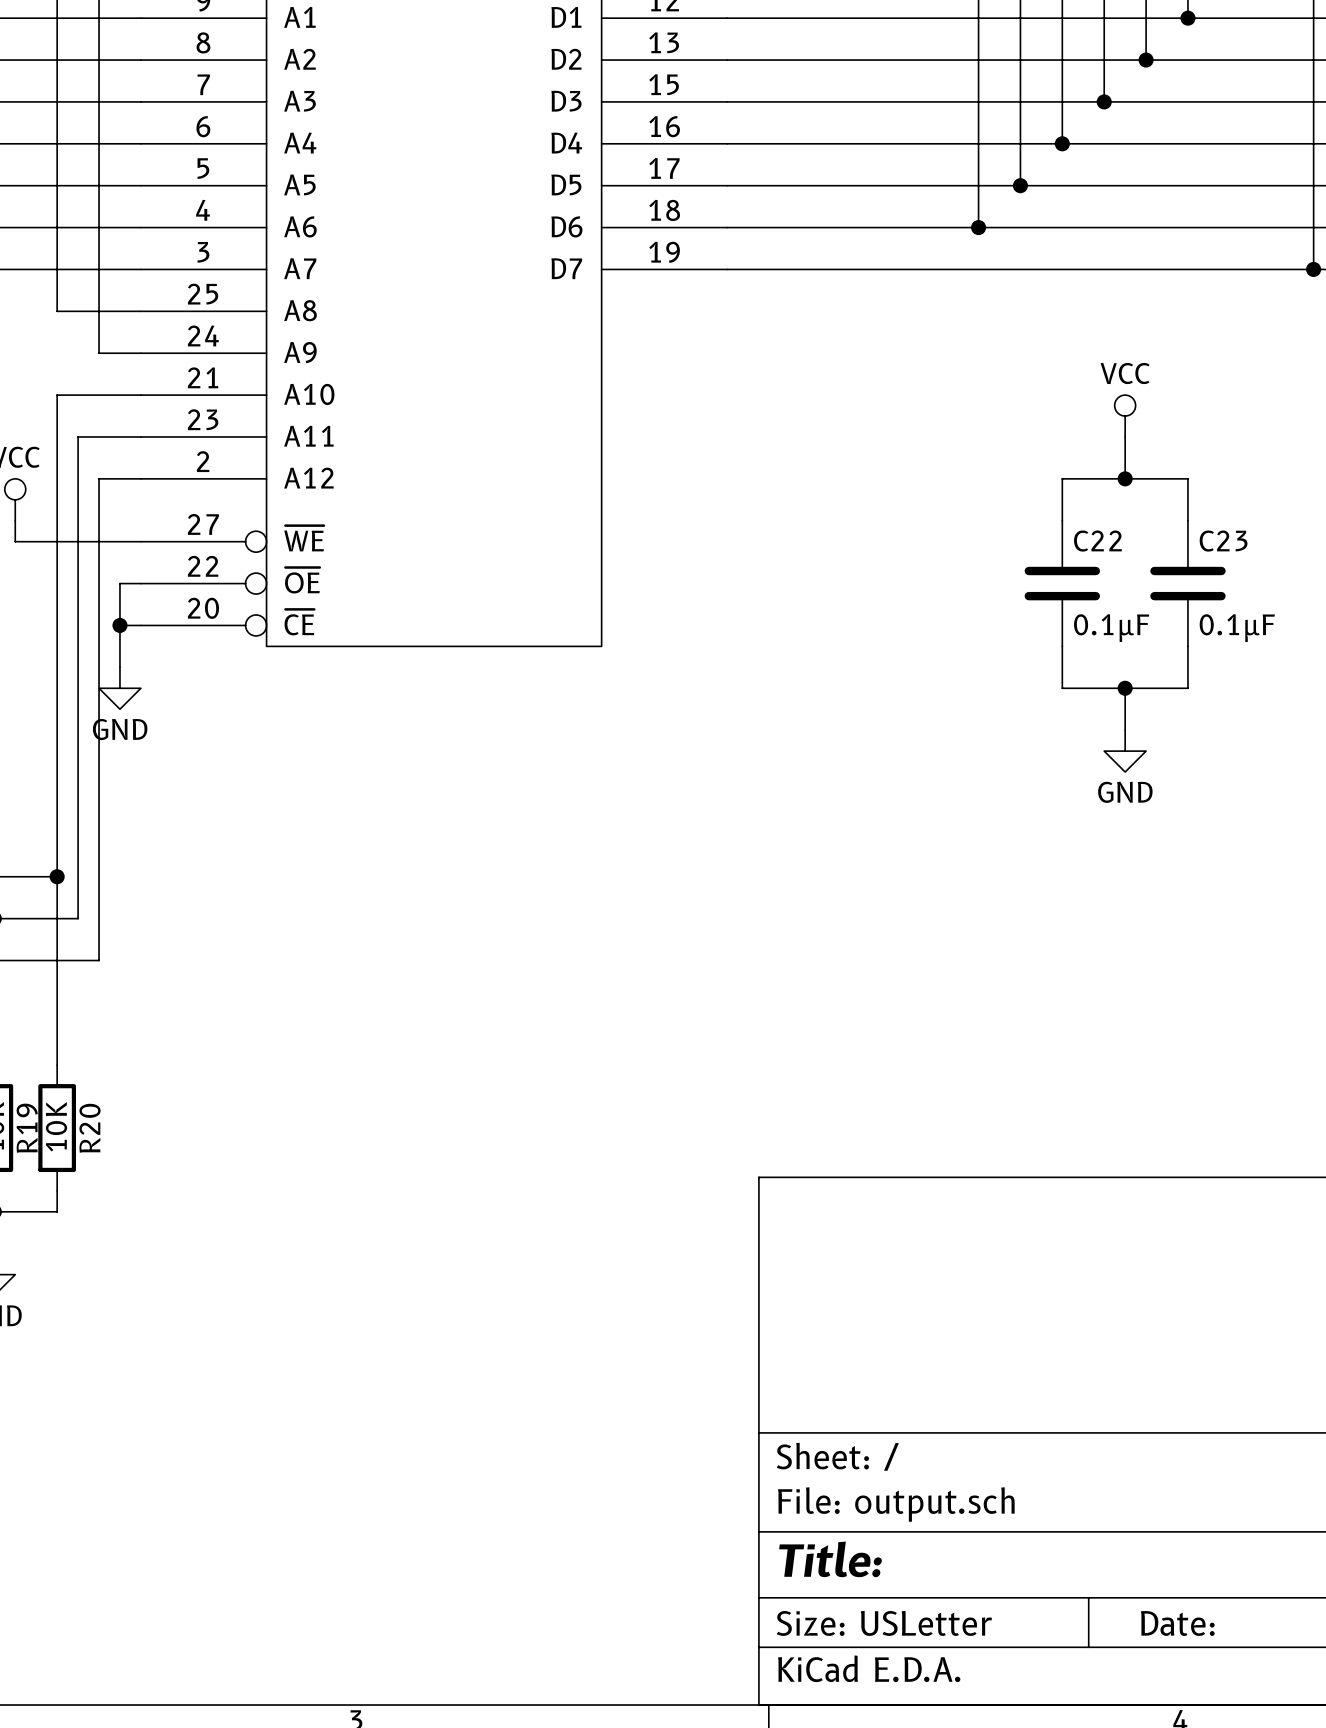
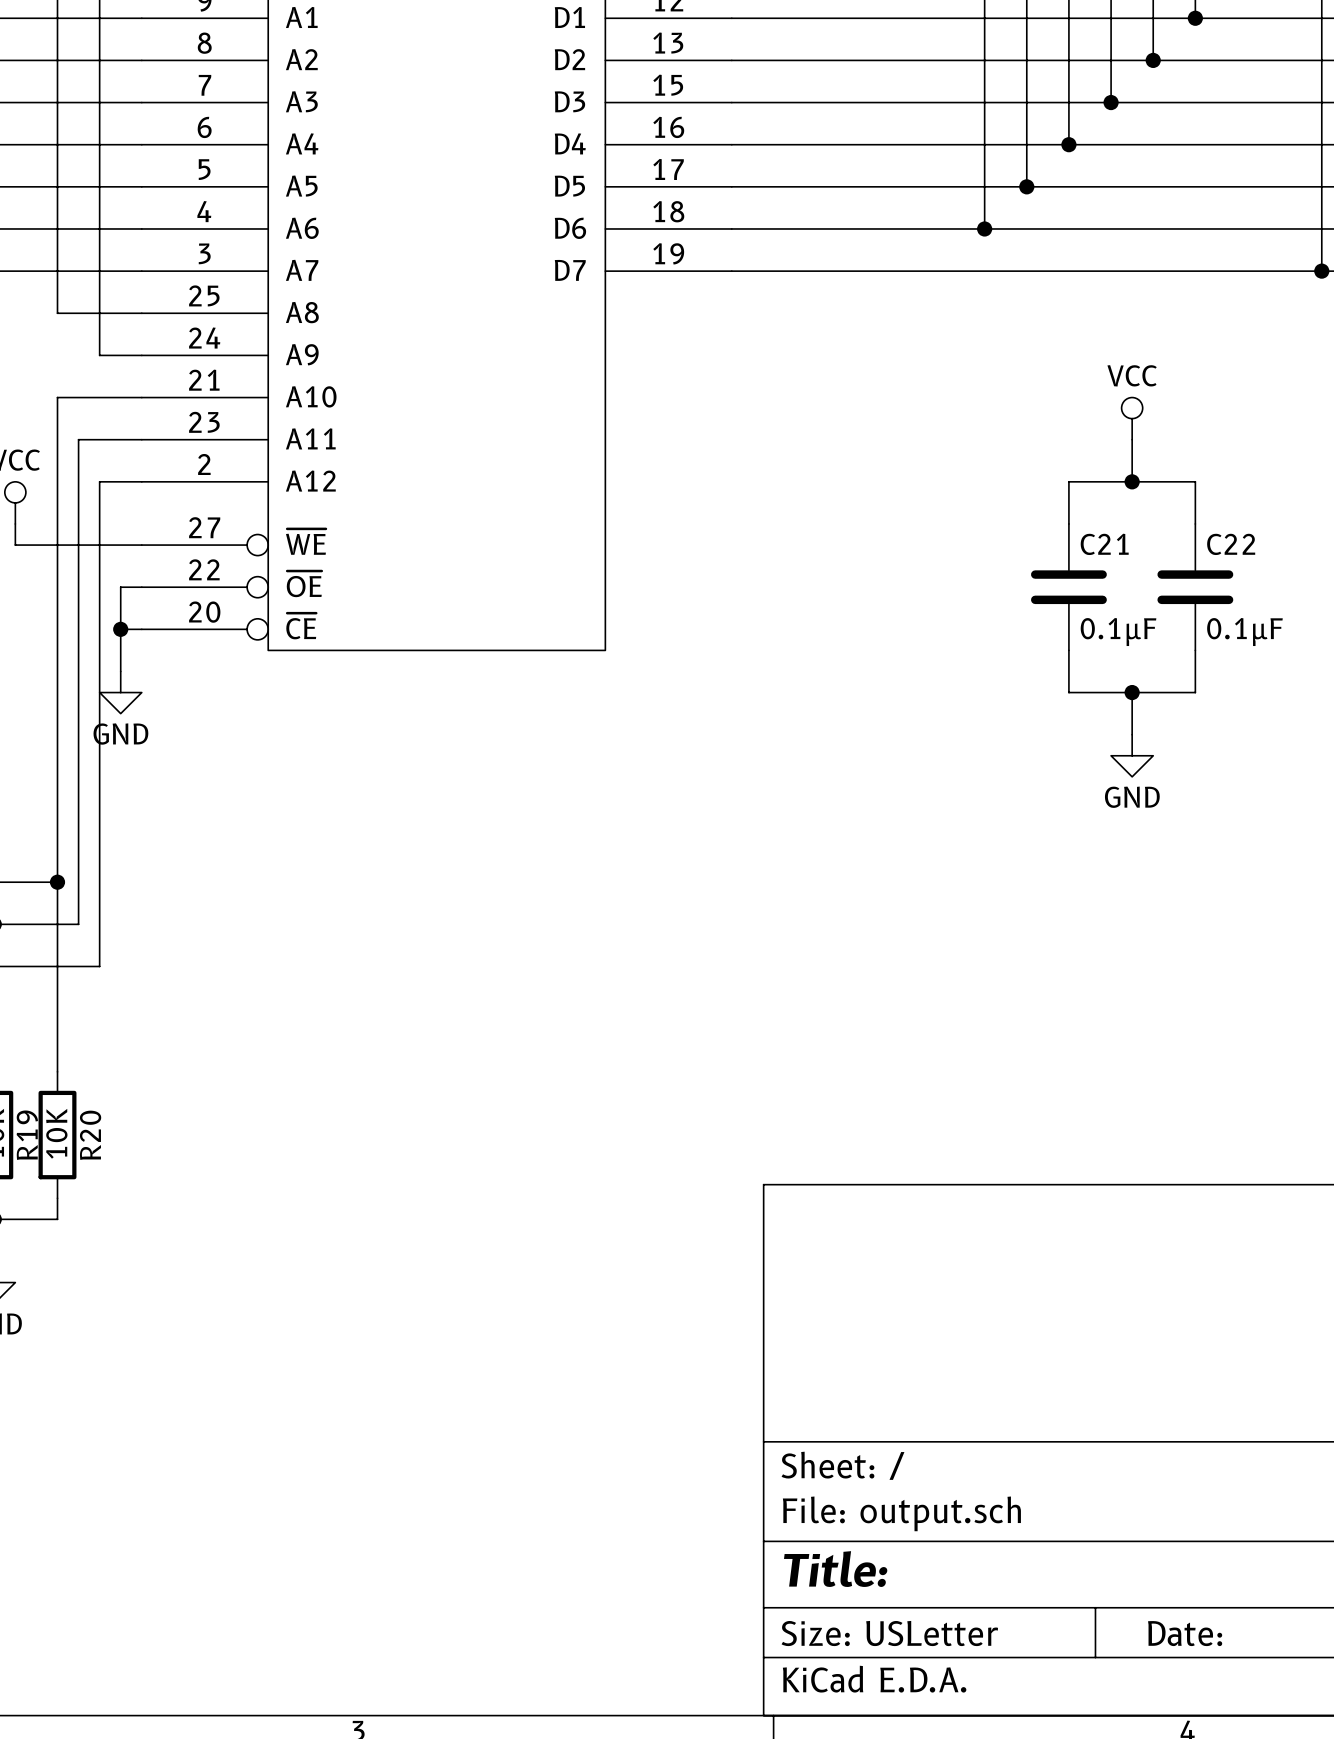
C22 name: C22 (1097, 541) -> C21 (1104, 544)
C23 name: C23 (1223, 541) -> C22 (1231, 544)

